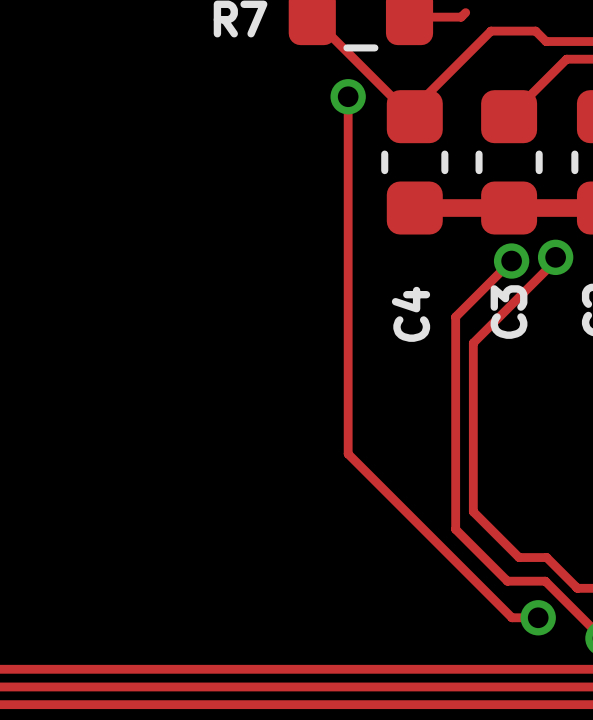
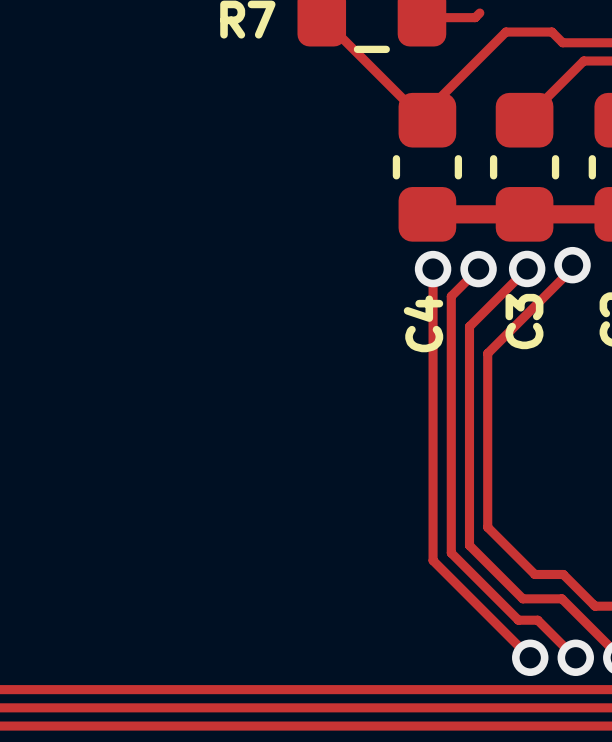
track: (348, 96) (348, 453) (511, 617) (538, 617) -> none
via: (348, 96) -> none
track: none -> (433, 269) (433, 560) (530, 657)
via: none -> (433, 269)
track: none -> (478, 269) (451, 296) (451, 553) (518, 620) (537, 620) (575, 657)
via: none -> (478, 269)
via: (538, 617) -> none
via: none -> (530, 657)
via: none -> (575, 657)

